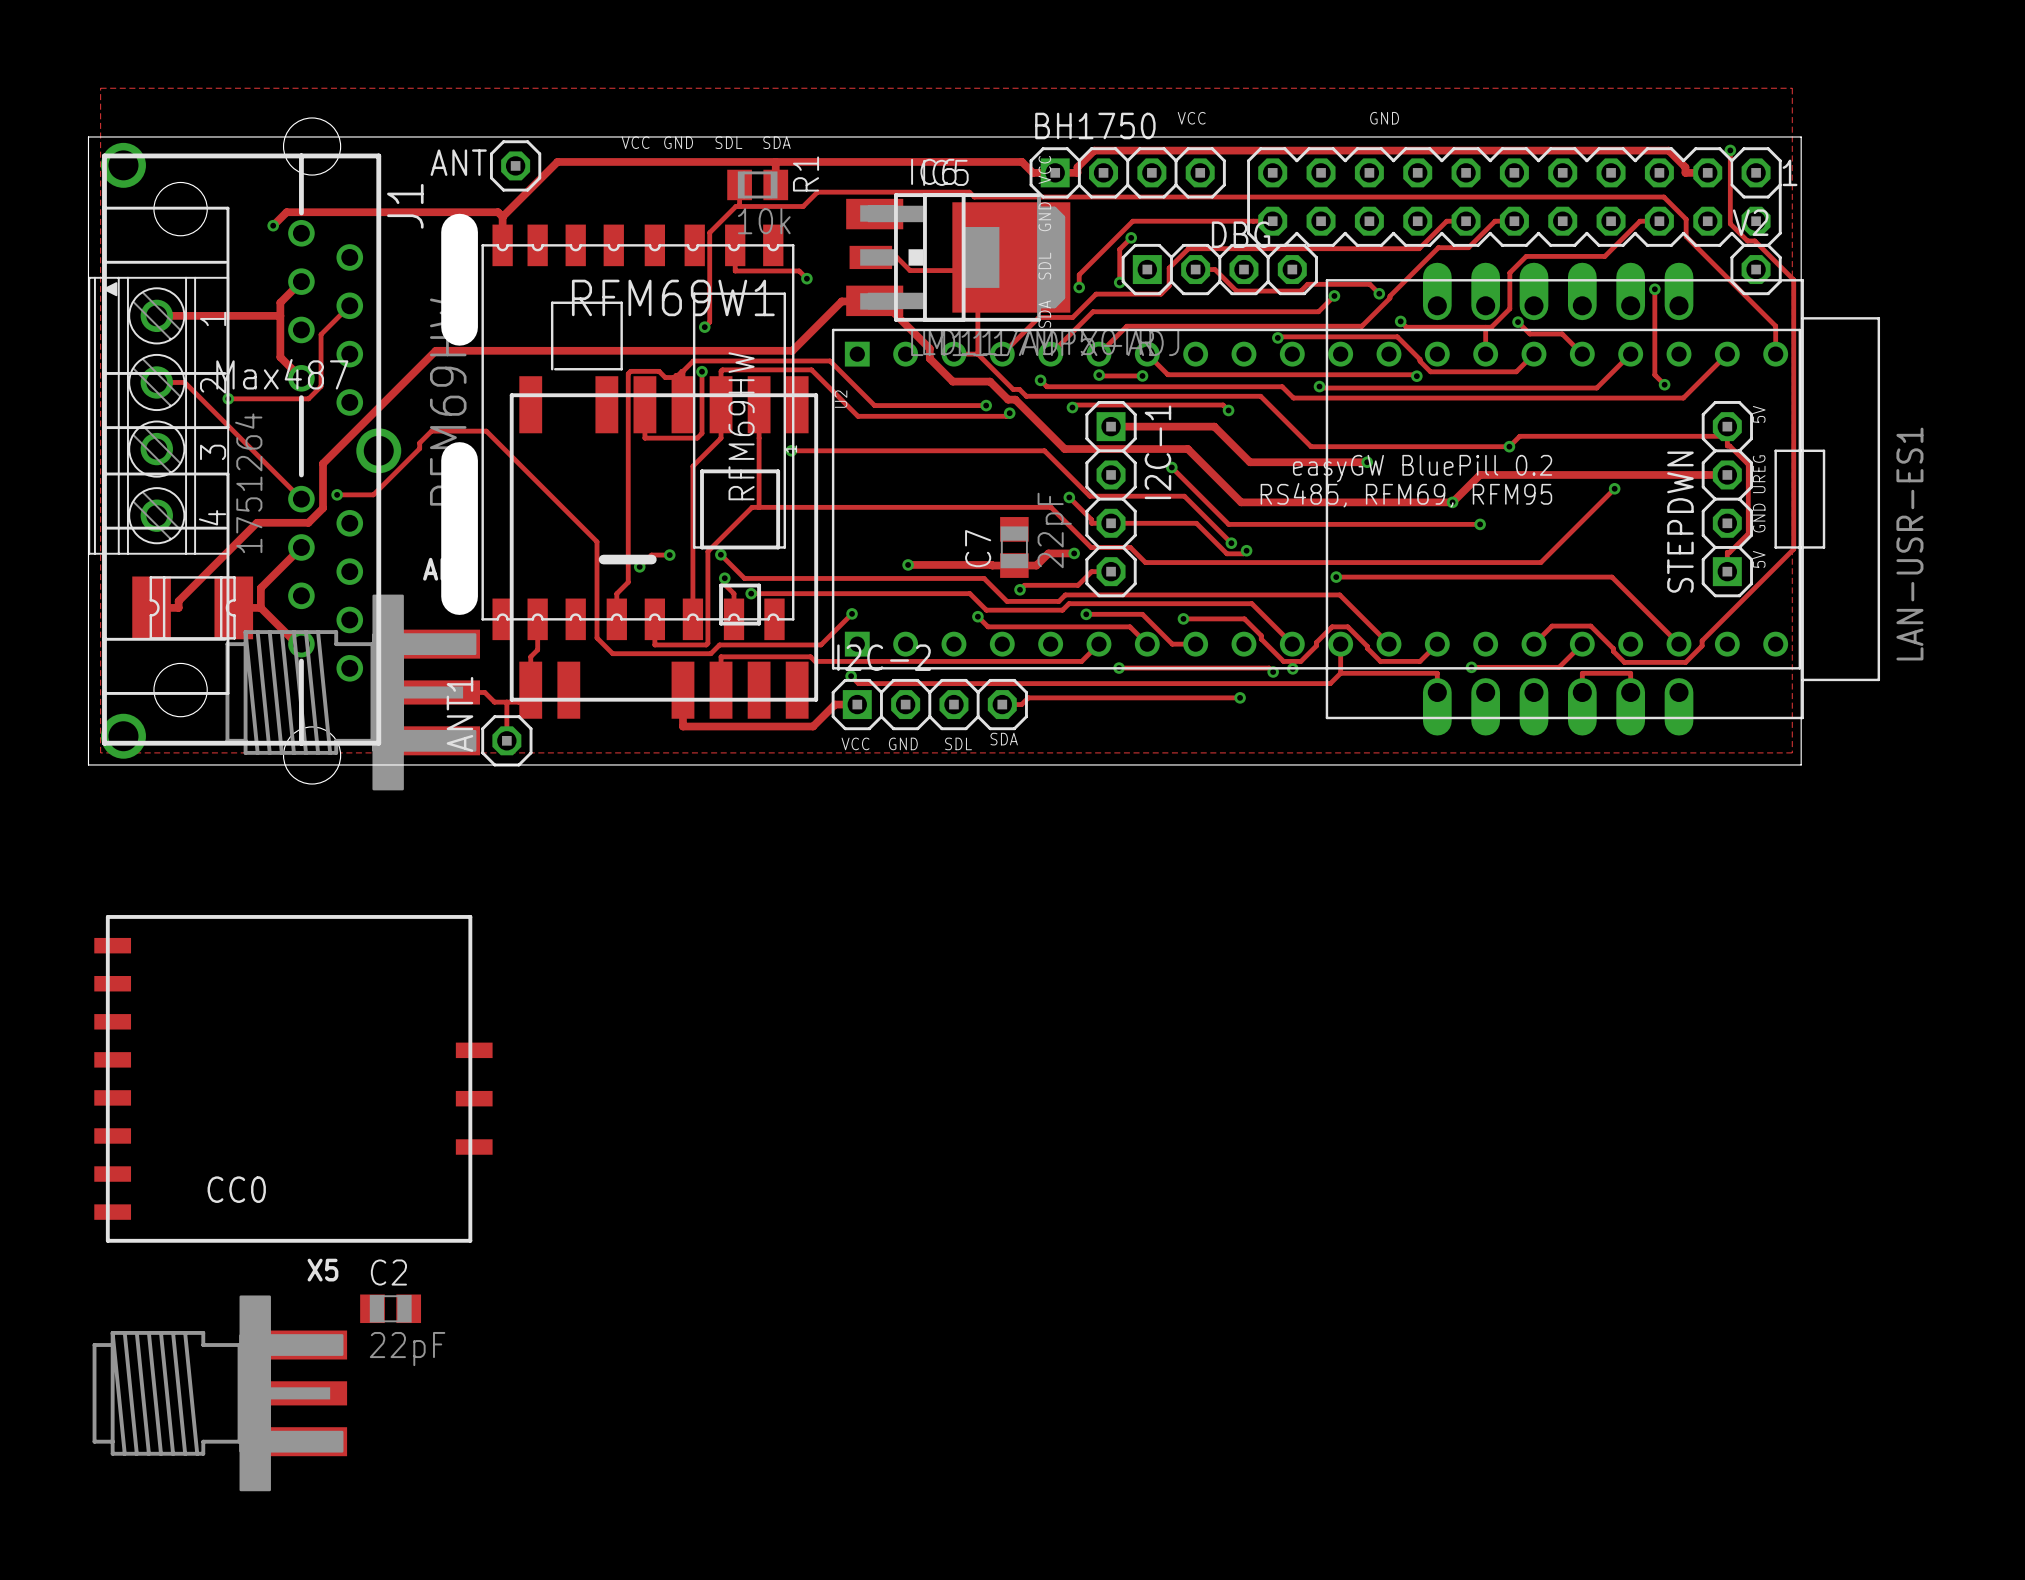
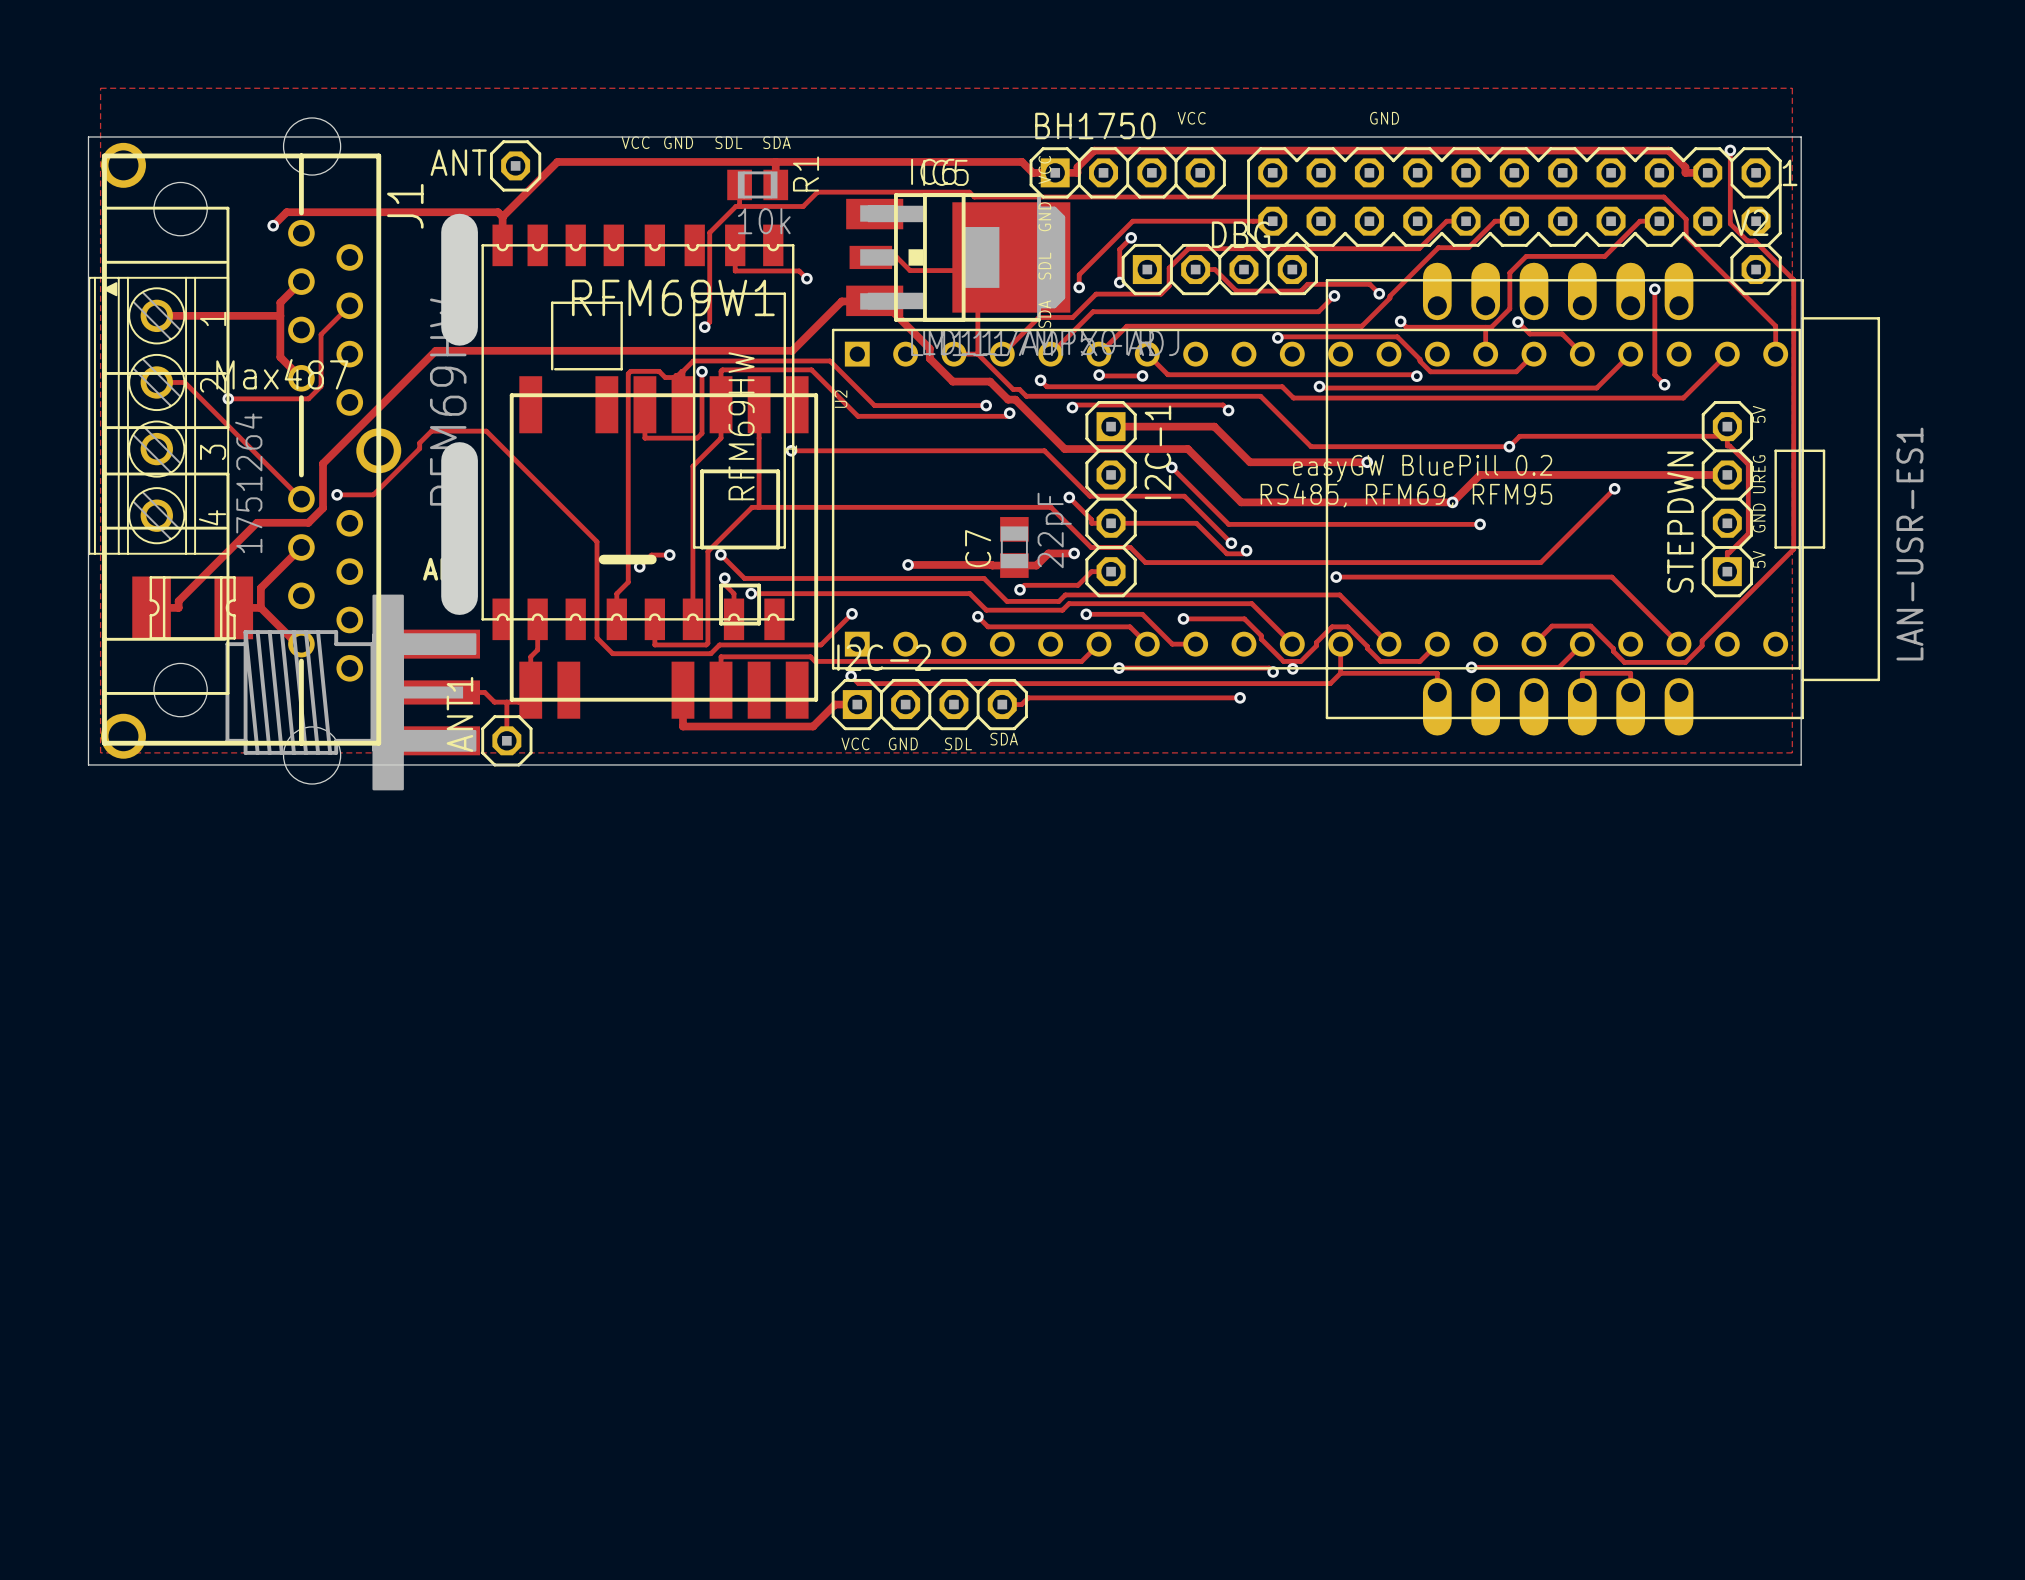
CC0: (293, 1078) -> none
C2: 22pF (390, 1308) -> none
X5: (219, 1393) -> none

